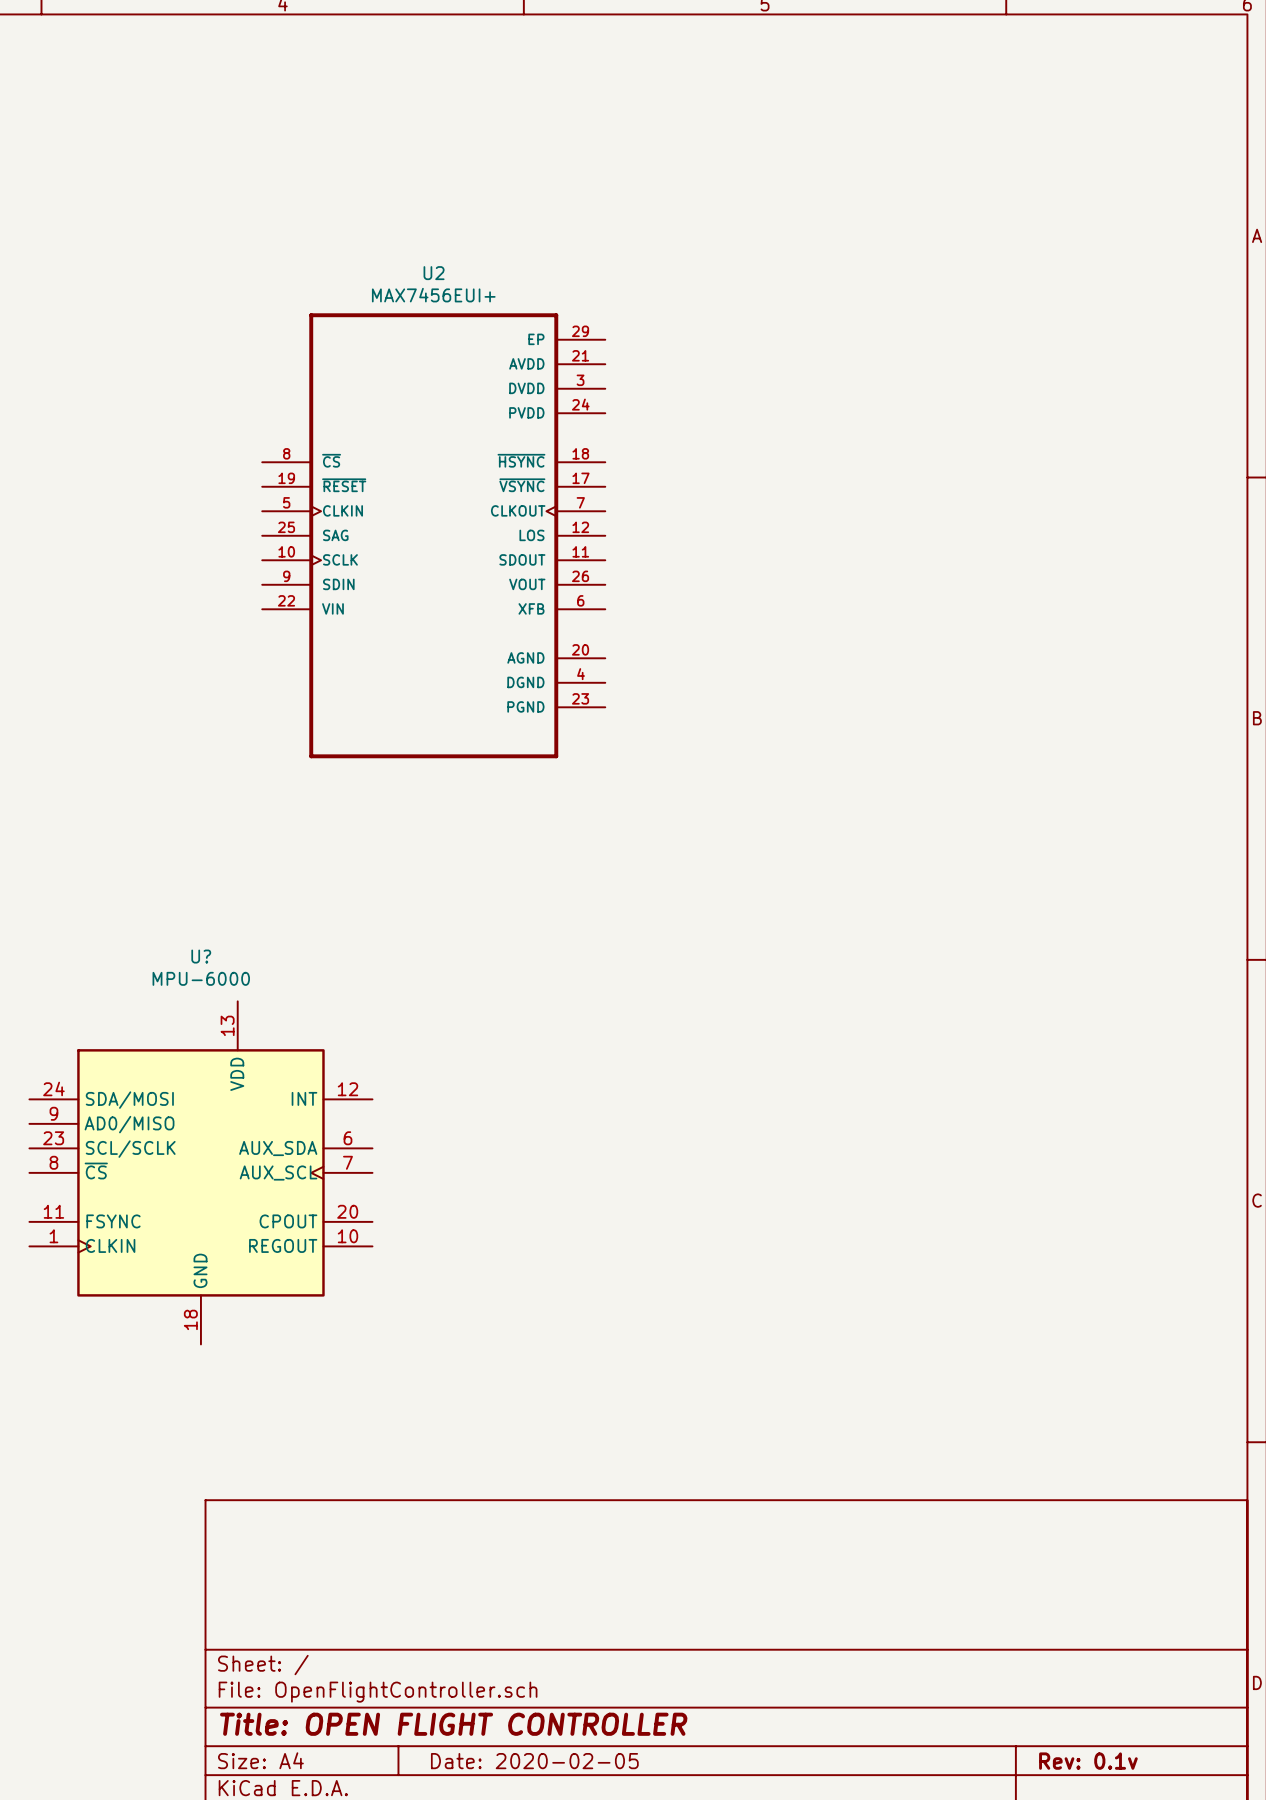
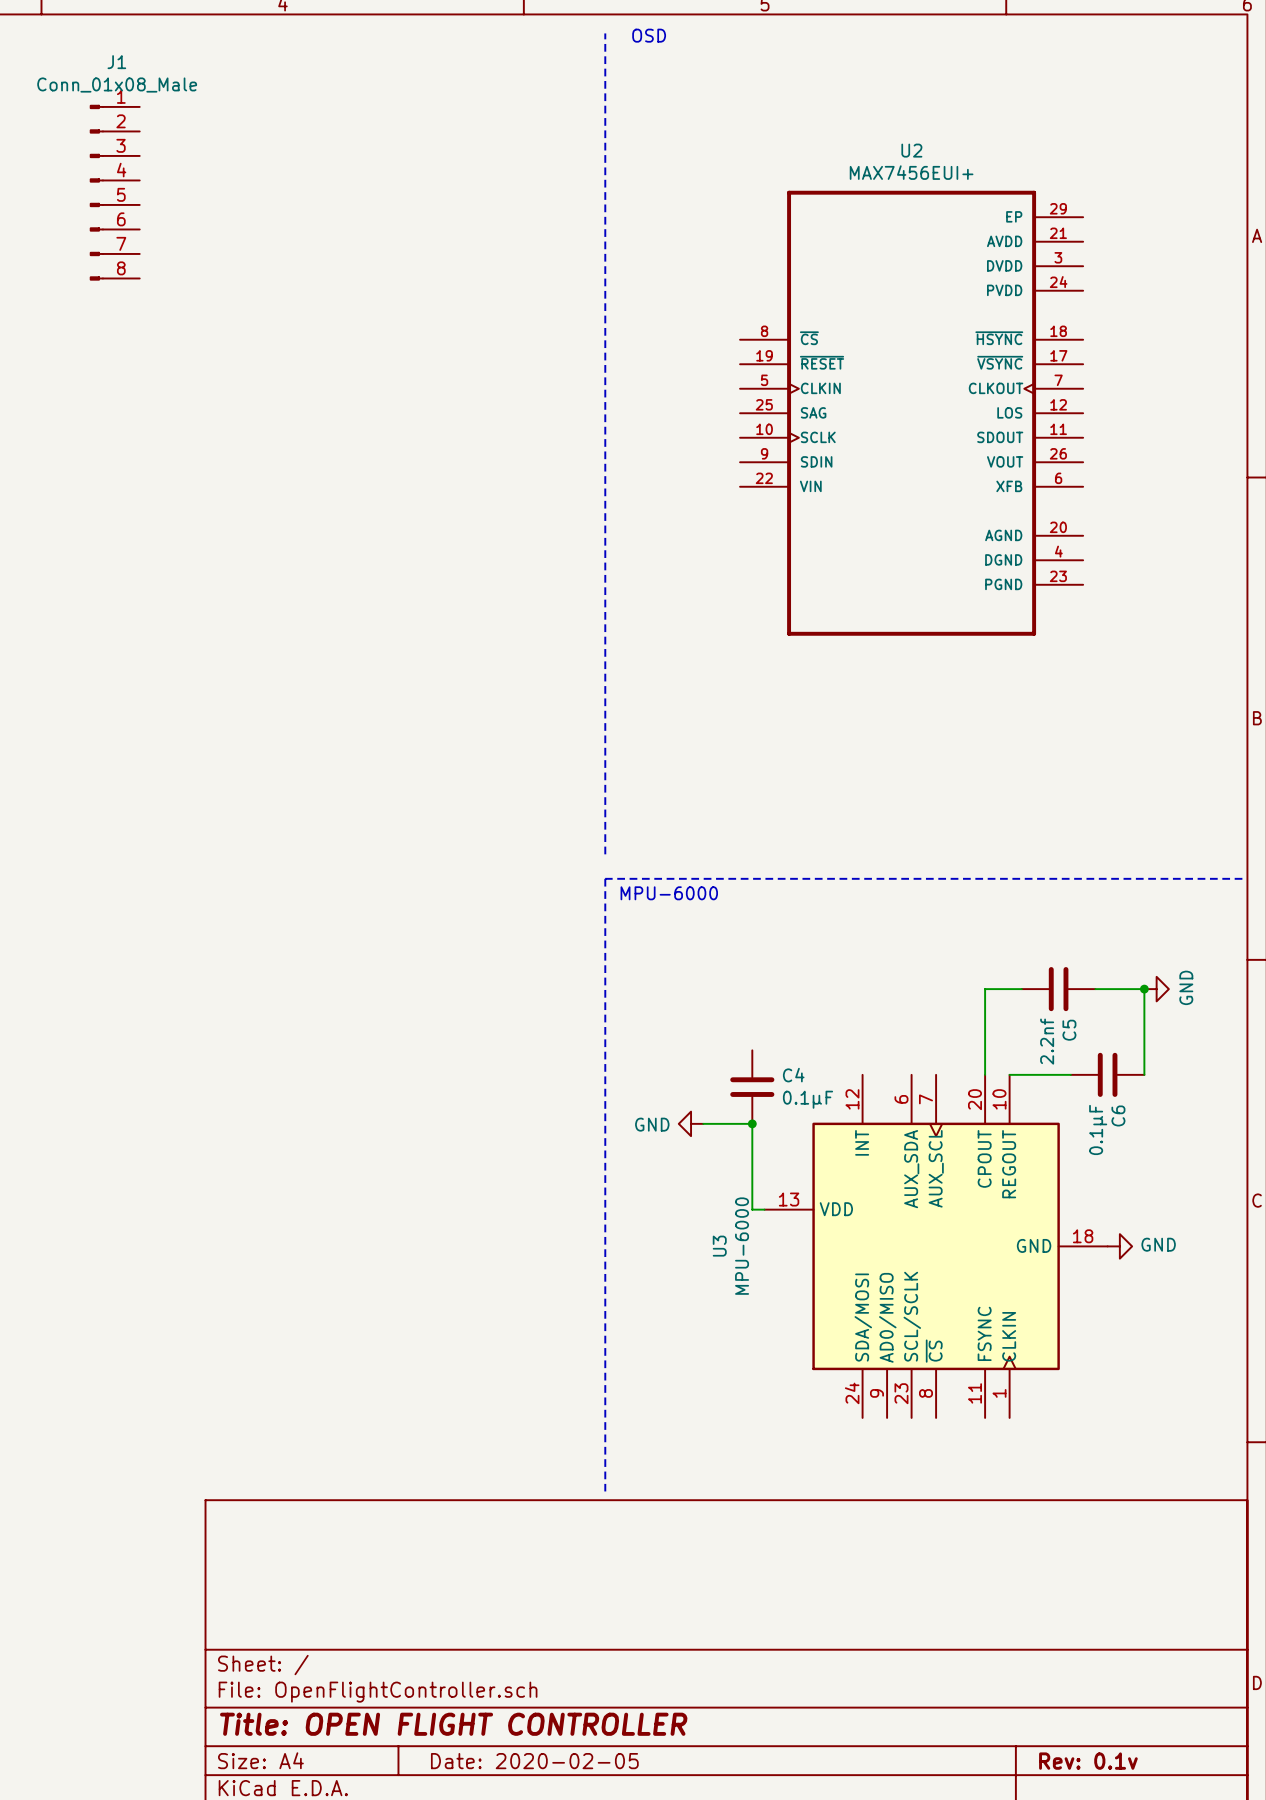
line: none -> (605, 33) (605, 854)
text: none -> OSD (649, 35)
J1: none -> Conn_01x08_Male (114, 192)
U2 position: (433, 535) -> (911, 413)
line: none -> (1242, 878) (605, 878) (605, 1491)
text: none -> MPU-6000 (669, 893)
wire: none -> (1021, 989) (985, 989) (985, 1074)
C5: none -> 2.2nf (1058, 989)
wire: none -> (1095, 989) (1144, 989) (1144, 1074)
junction: none -> (1144, 989)
power symbol: none -> GND (1156, 989)
wire: none -> (1009, 1074) (1070, 1074)
C6: none -> 0.1µF (1107, 1074)
C4: none -> 0.1µF (752, 1087)
power symbol: none -> GND (691, 1123)
wire: none -> (703, 1123) (752, 1123) (752, 1209) (764, 1209)
junction: none -> (752, 1123)
U?: MPU-6000 (200, 1172) -> none
U3: none -> MPU-6000 (936, 1246)
power symbol: none -> GND (1119, 1246)

